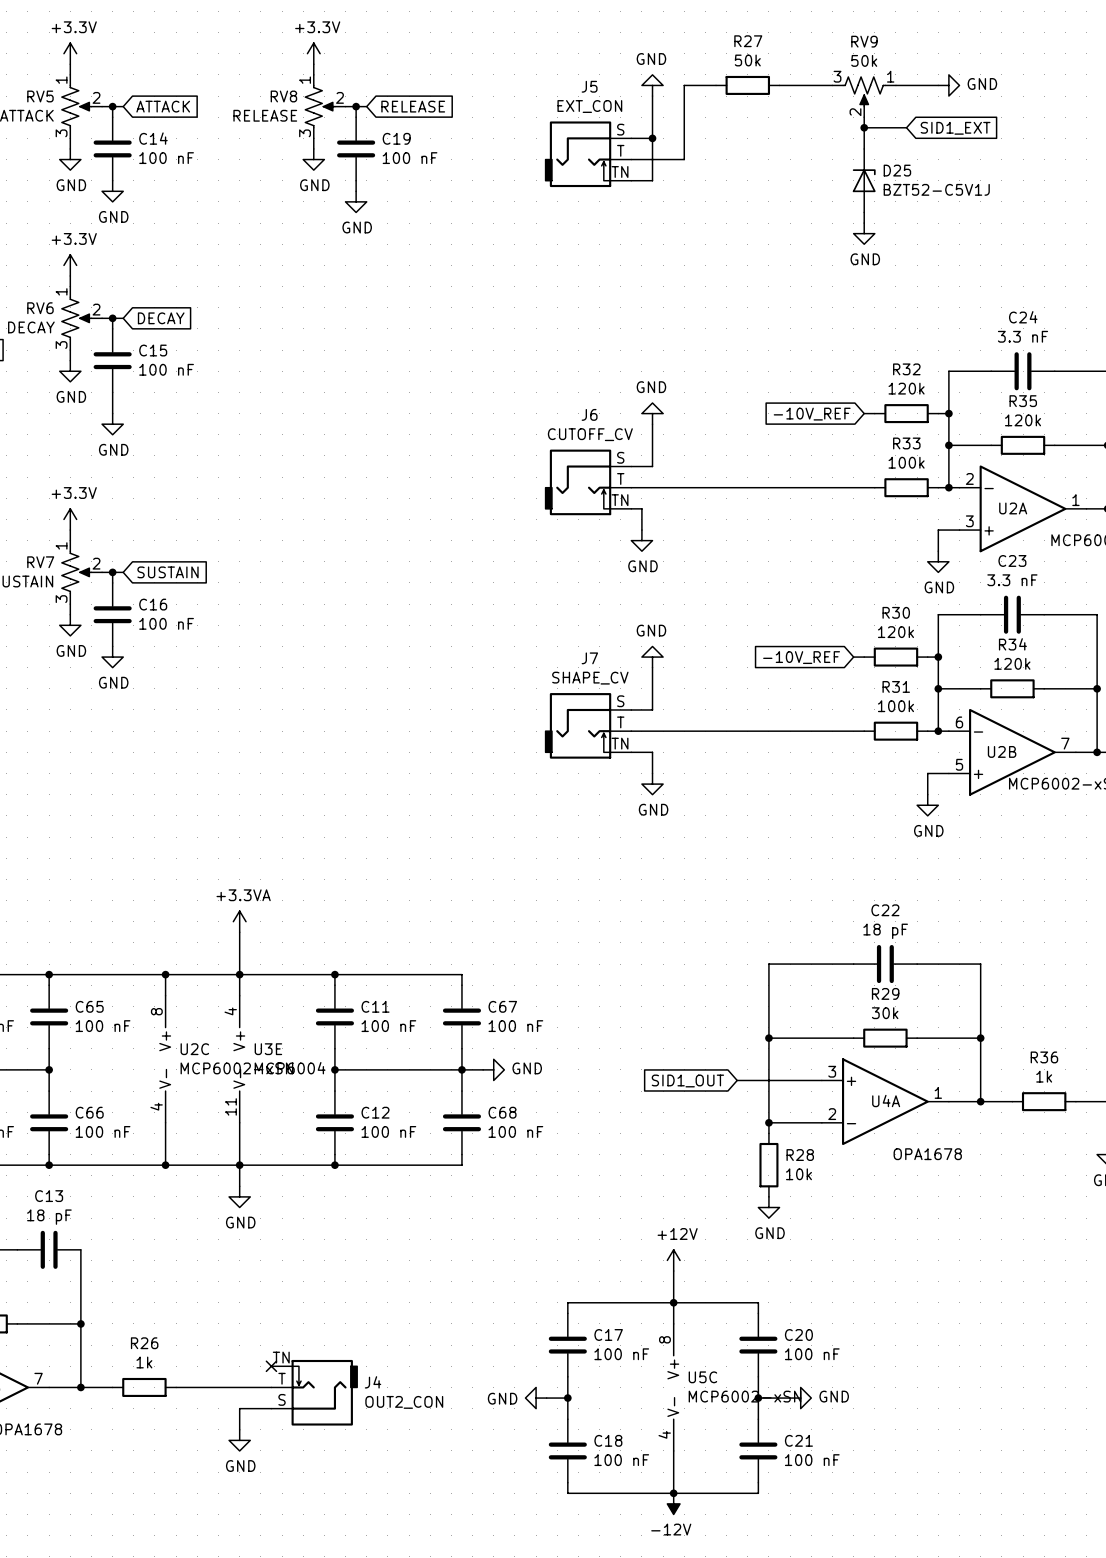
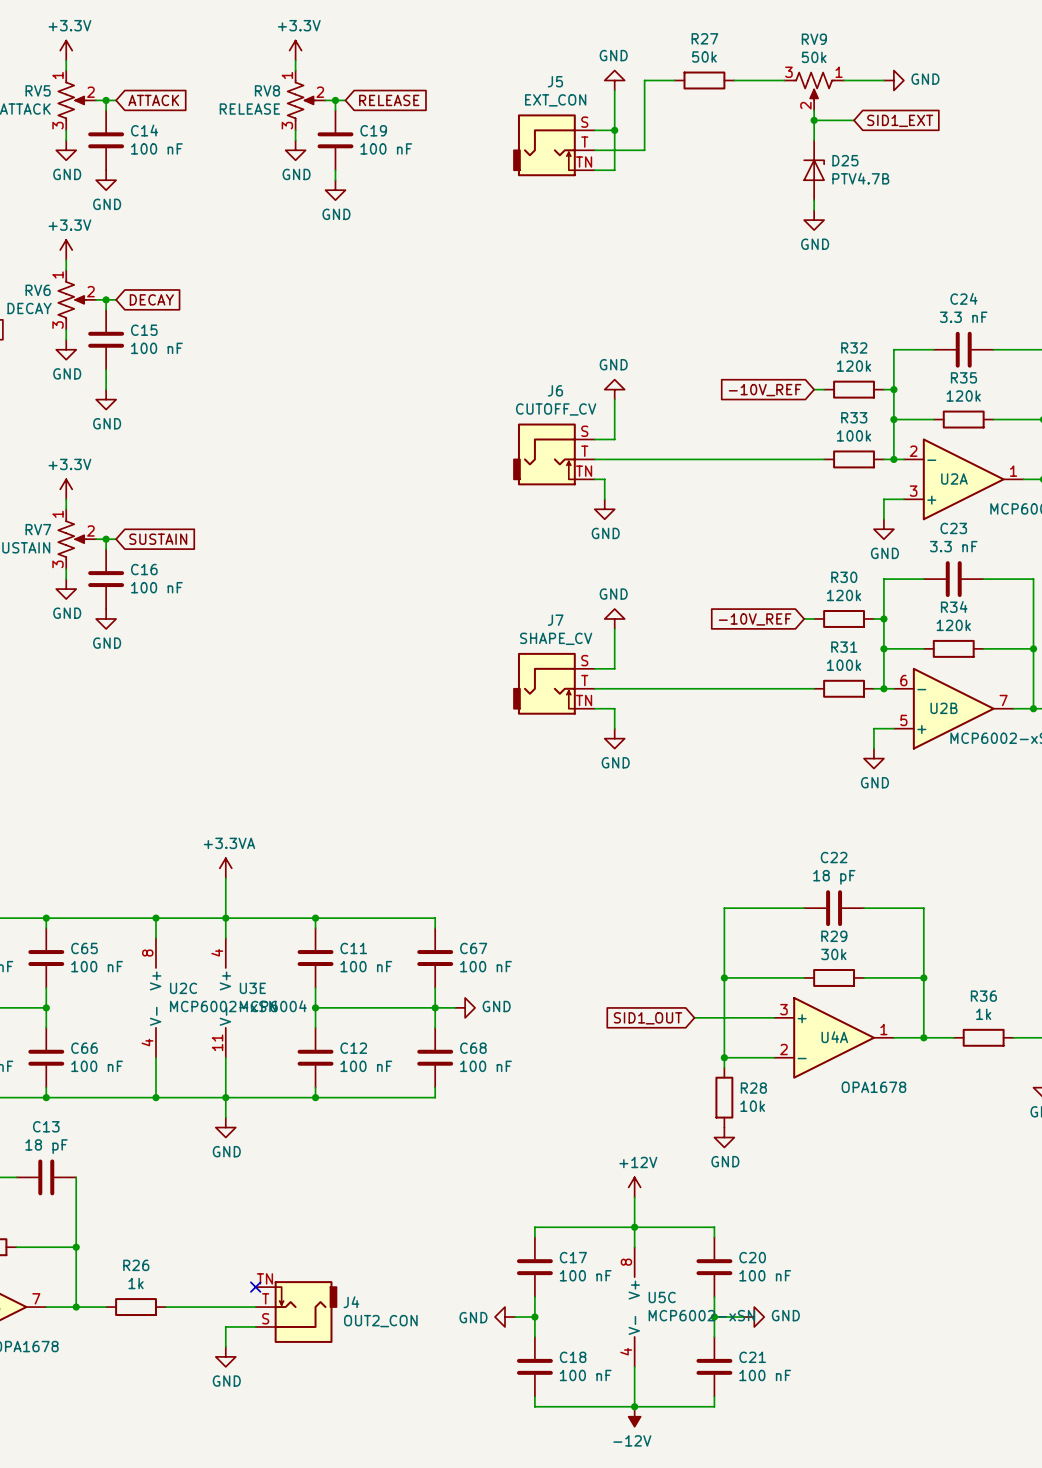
D25 value: BZT52-C5V1J (936, 189) -> PTV4.7B (860, 178)

